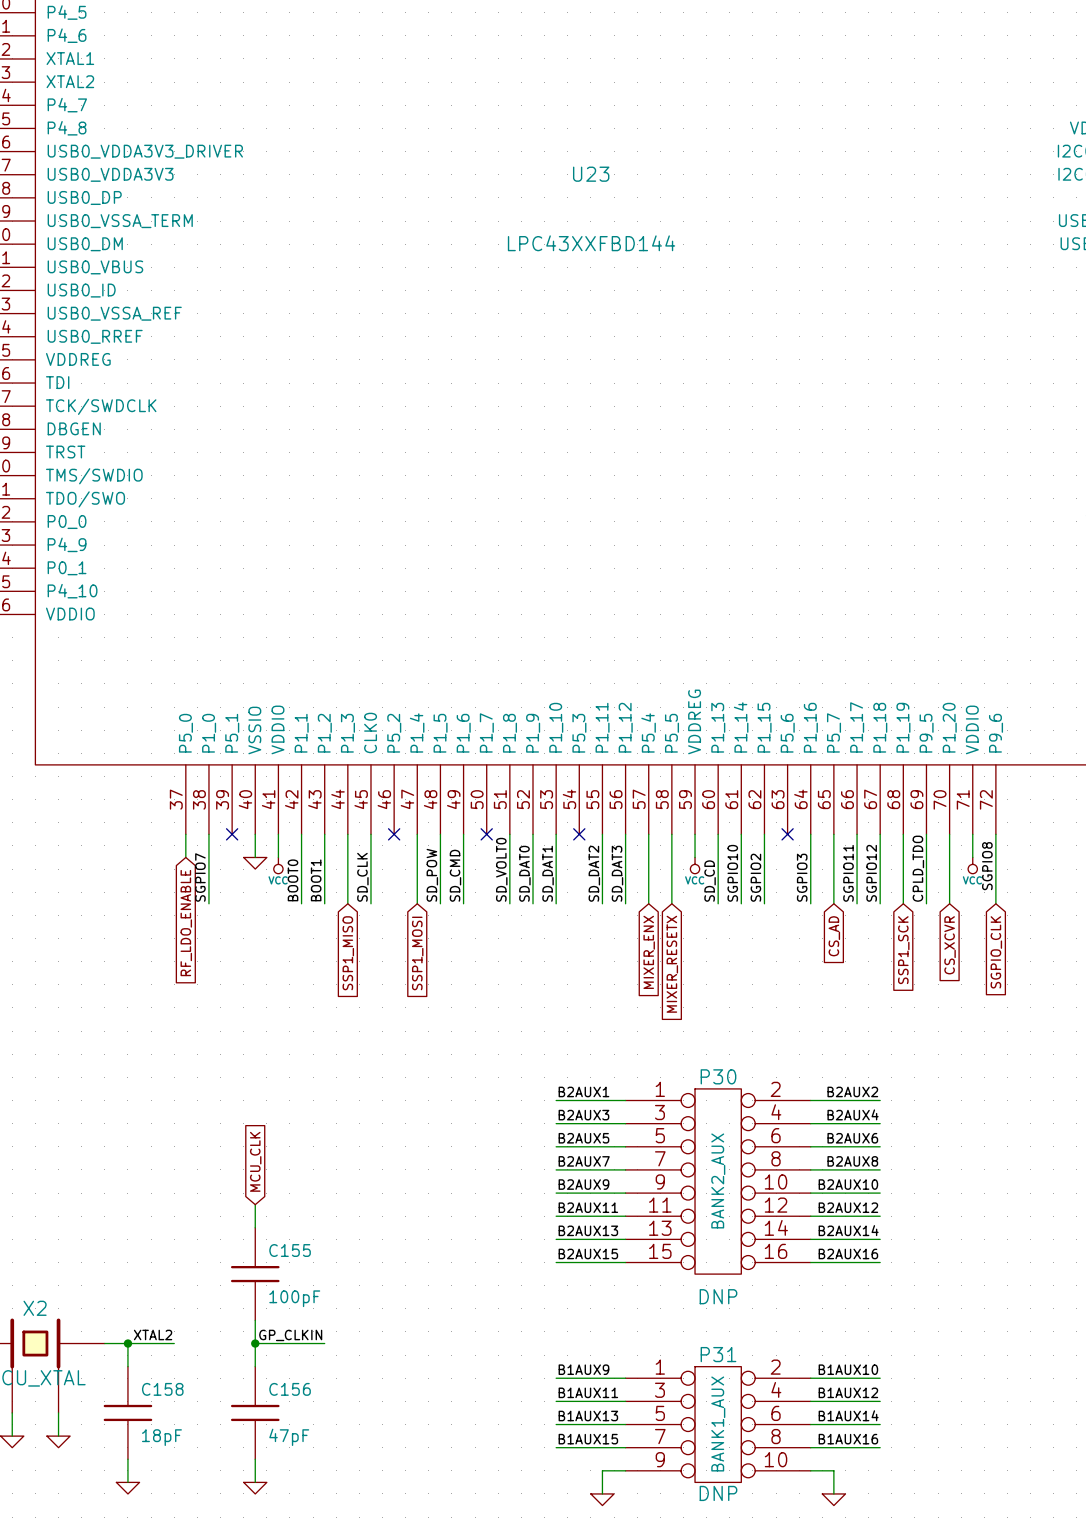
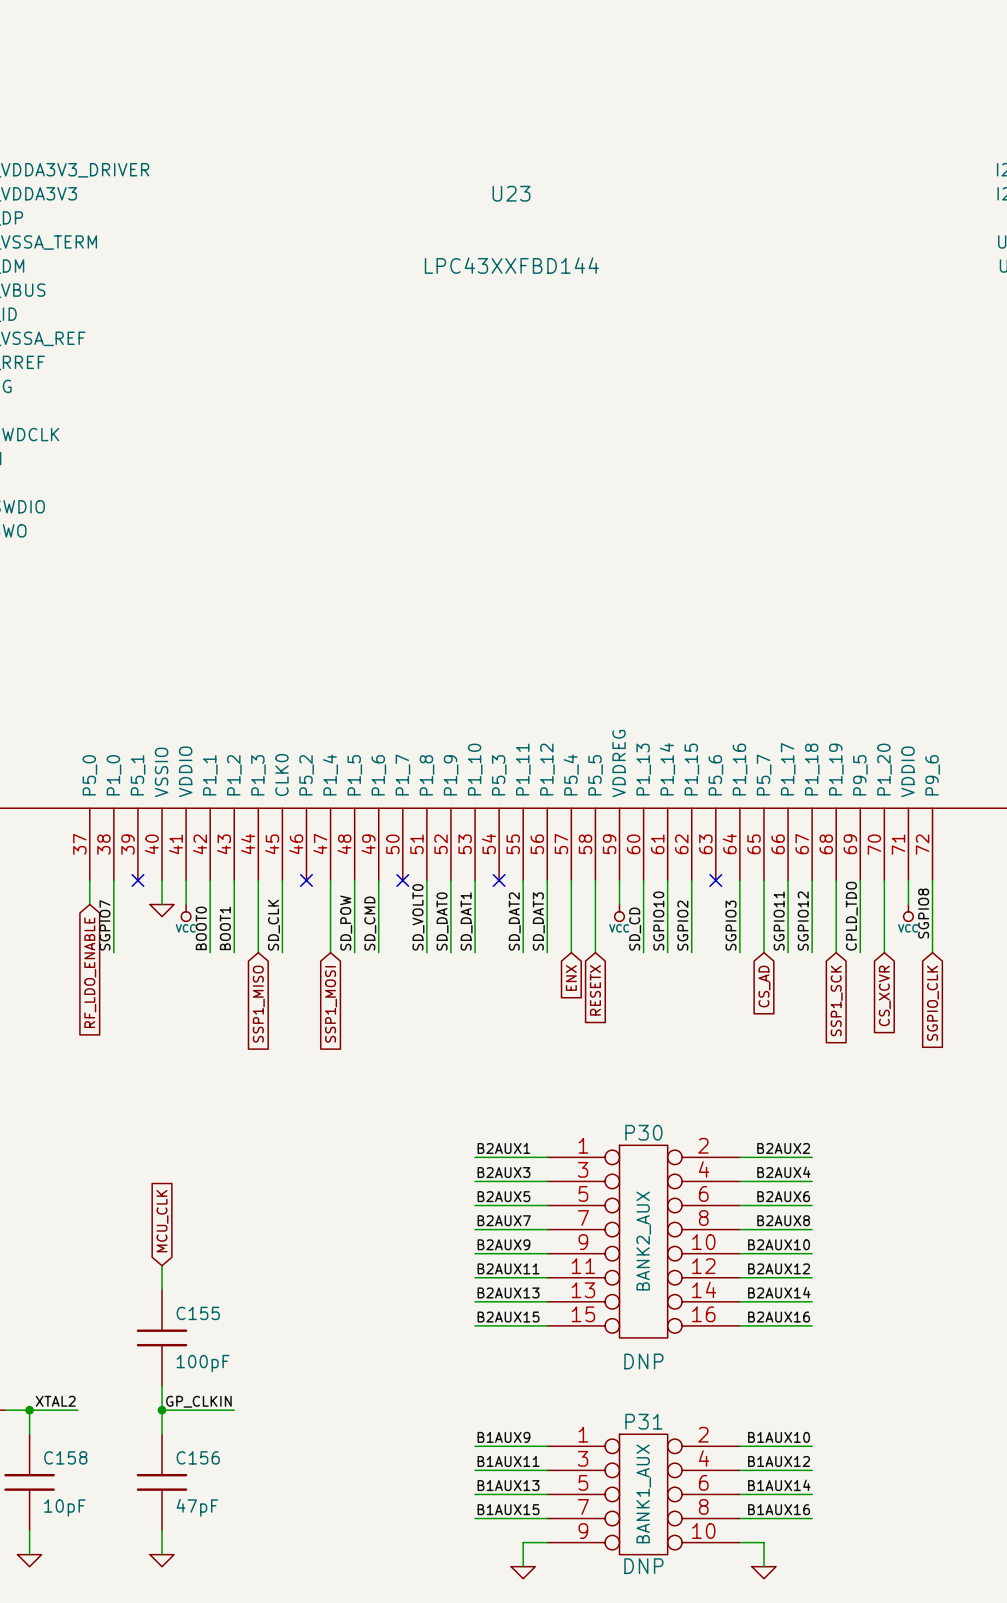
global label: MIXER_ENX (649, 952) -> ENX (571, 978)
global label: MIXER_RESETX (672, 964) -> RESETX (595, 990)
C158 value: 18pF (161, 1437) -> 10pF (64, 1508)

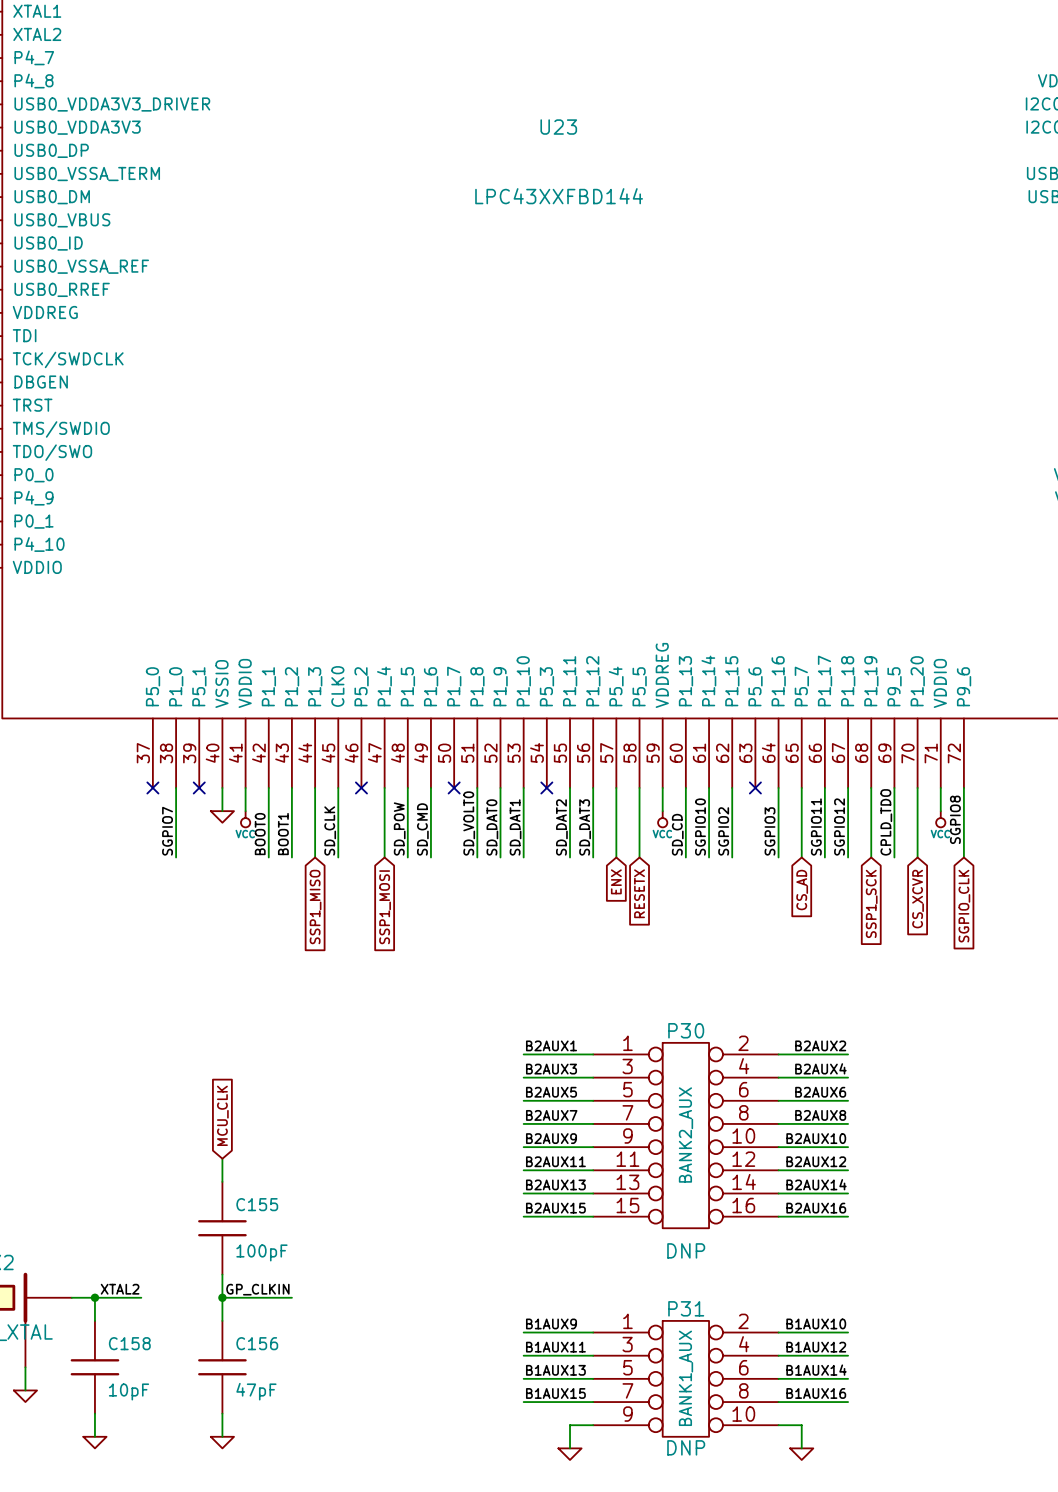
wire: (89, 880) (89, 904) -> none
no-connect mark: none -> (152, 787)
global label: RF_LDO_ENABLE (90, 972) -> none

